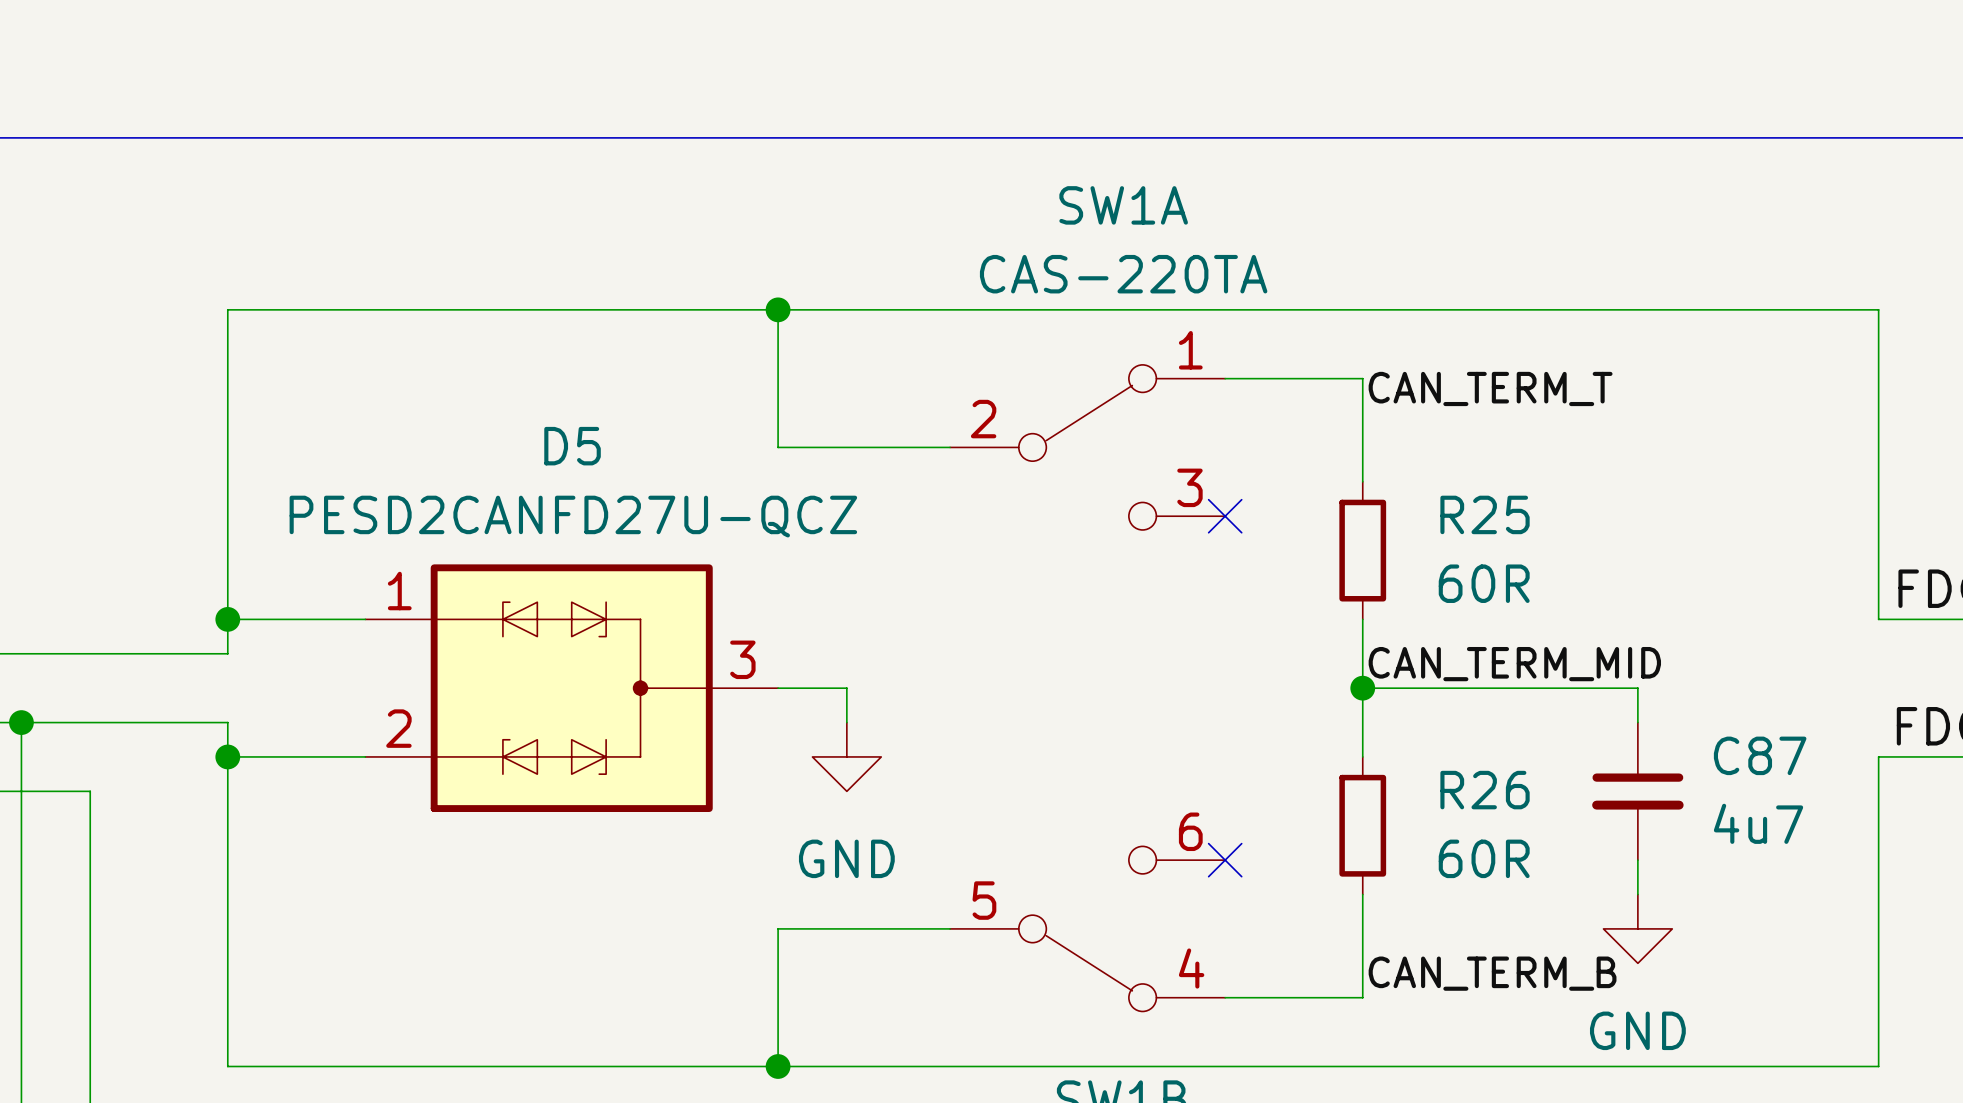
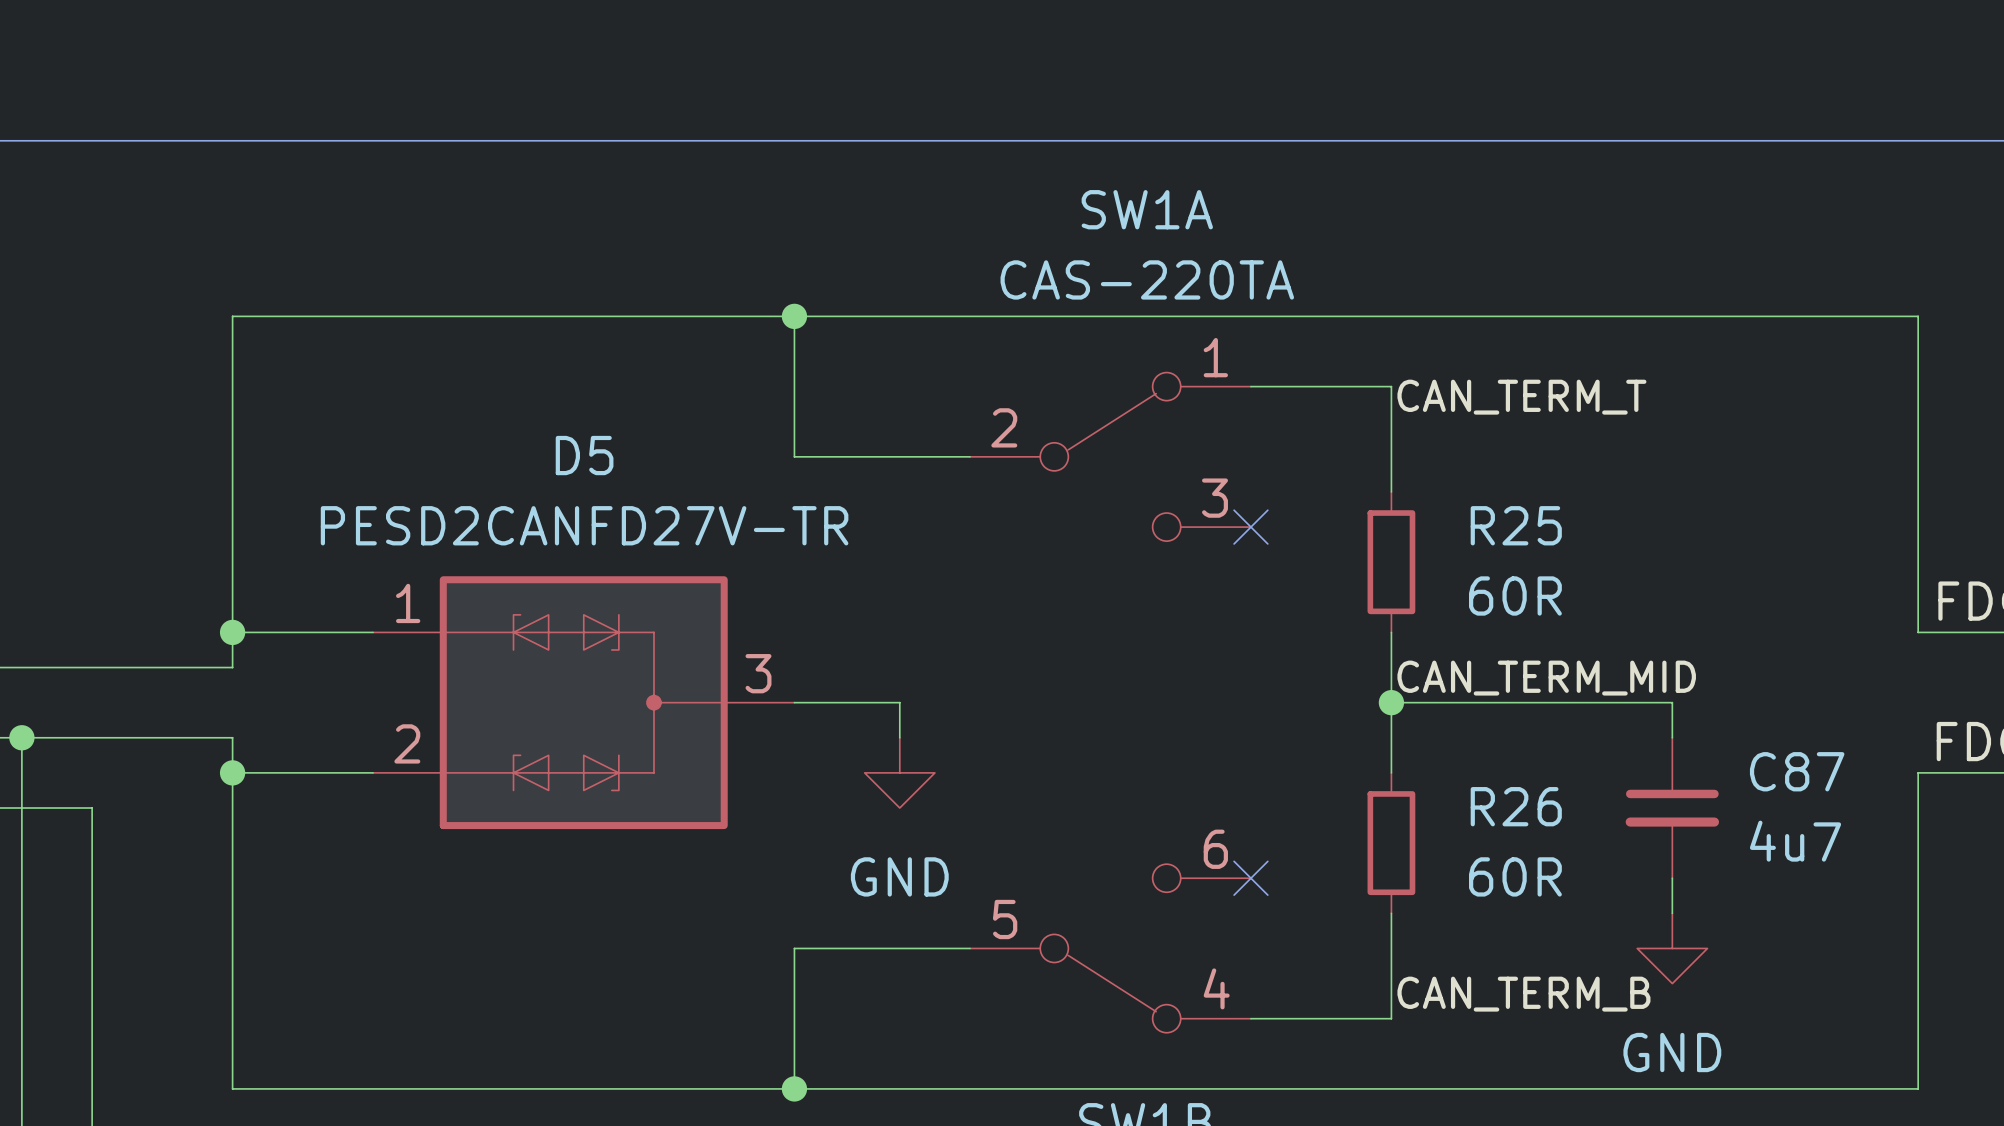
D5 value: PESD2CANFD27U-QCZ (573, 516) -> PESD2CANFD27V-TR (584, 525)
wire: (846, 688) (846, 722) -> (864, 702) (899, 702) (899, 737)
power symbol position: GND (846, 756) -> GND (899, 772)

